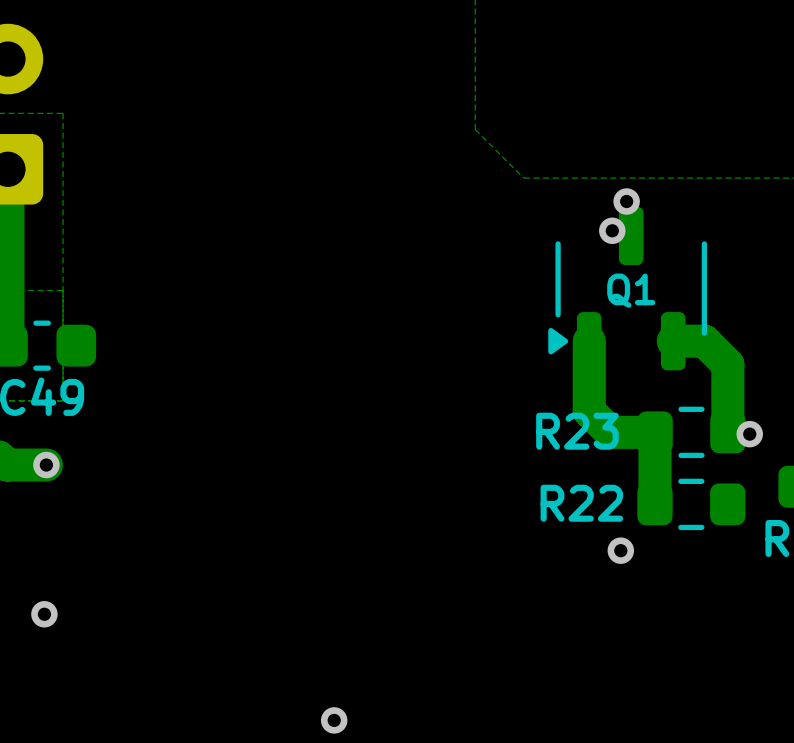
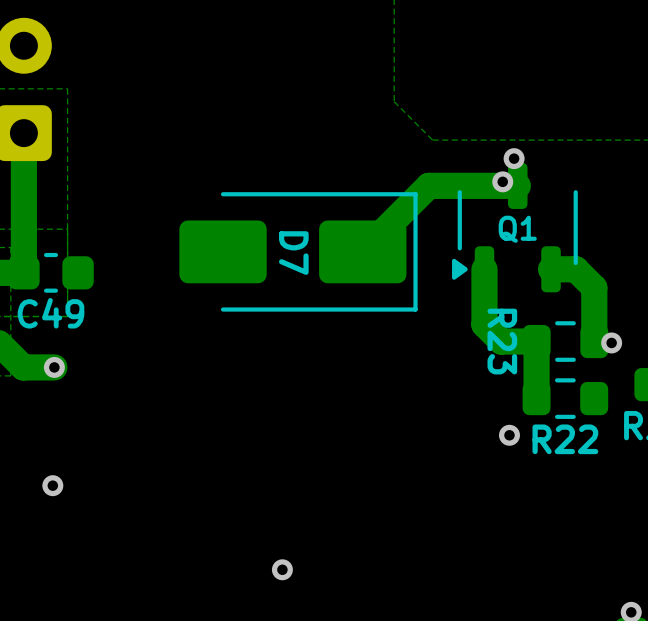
track: none -> (517, 185) (428, 185) (362, 251)
D7: none -> (298, 251)
R23 name rotation: 0° (577, 431) -> 90° clockwise (502, 341)
R22 name position: R22 (581, 503) -> R22 (565, 439)

